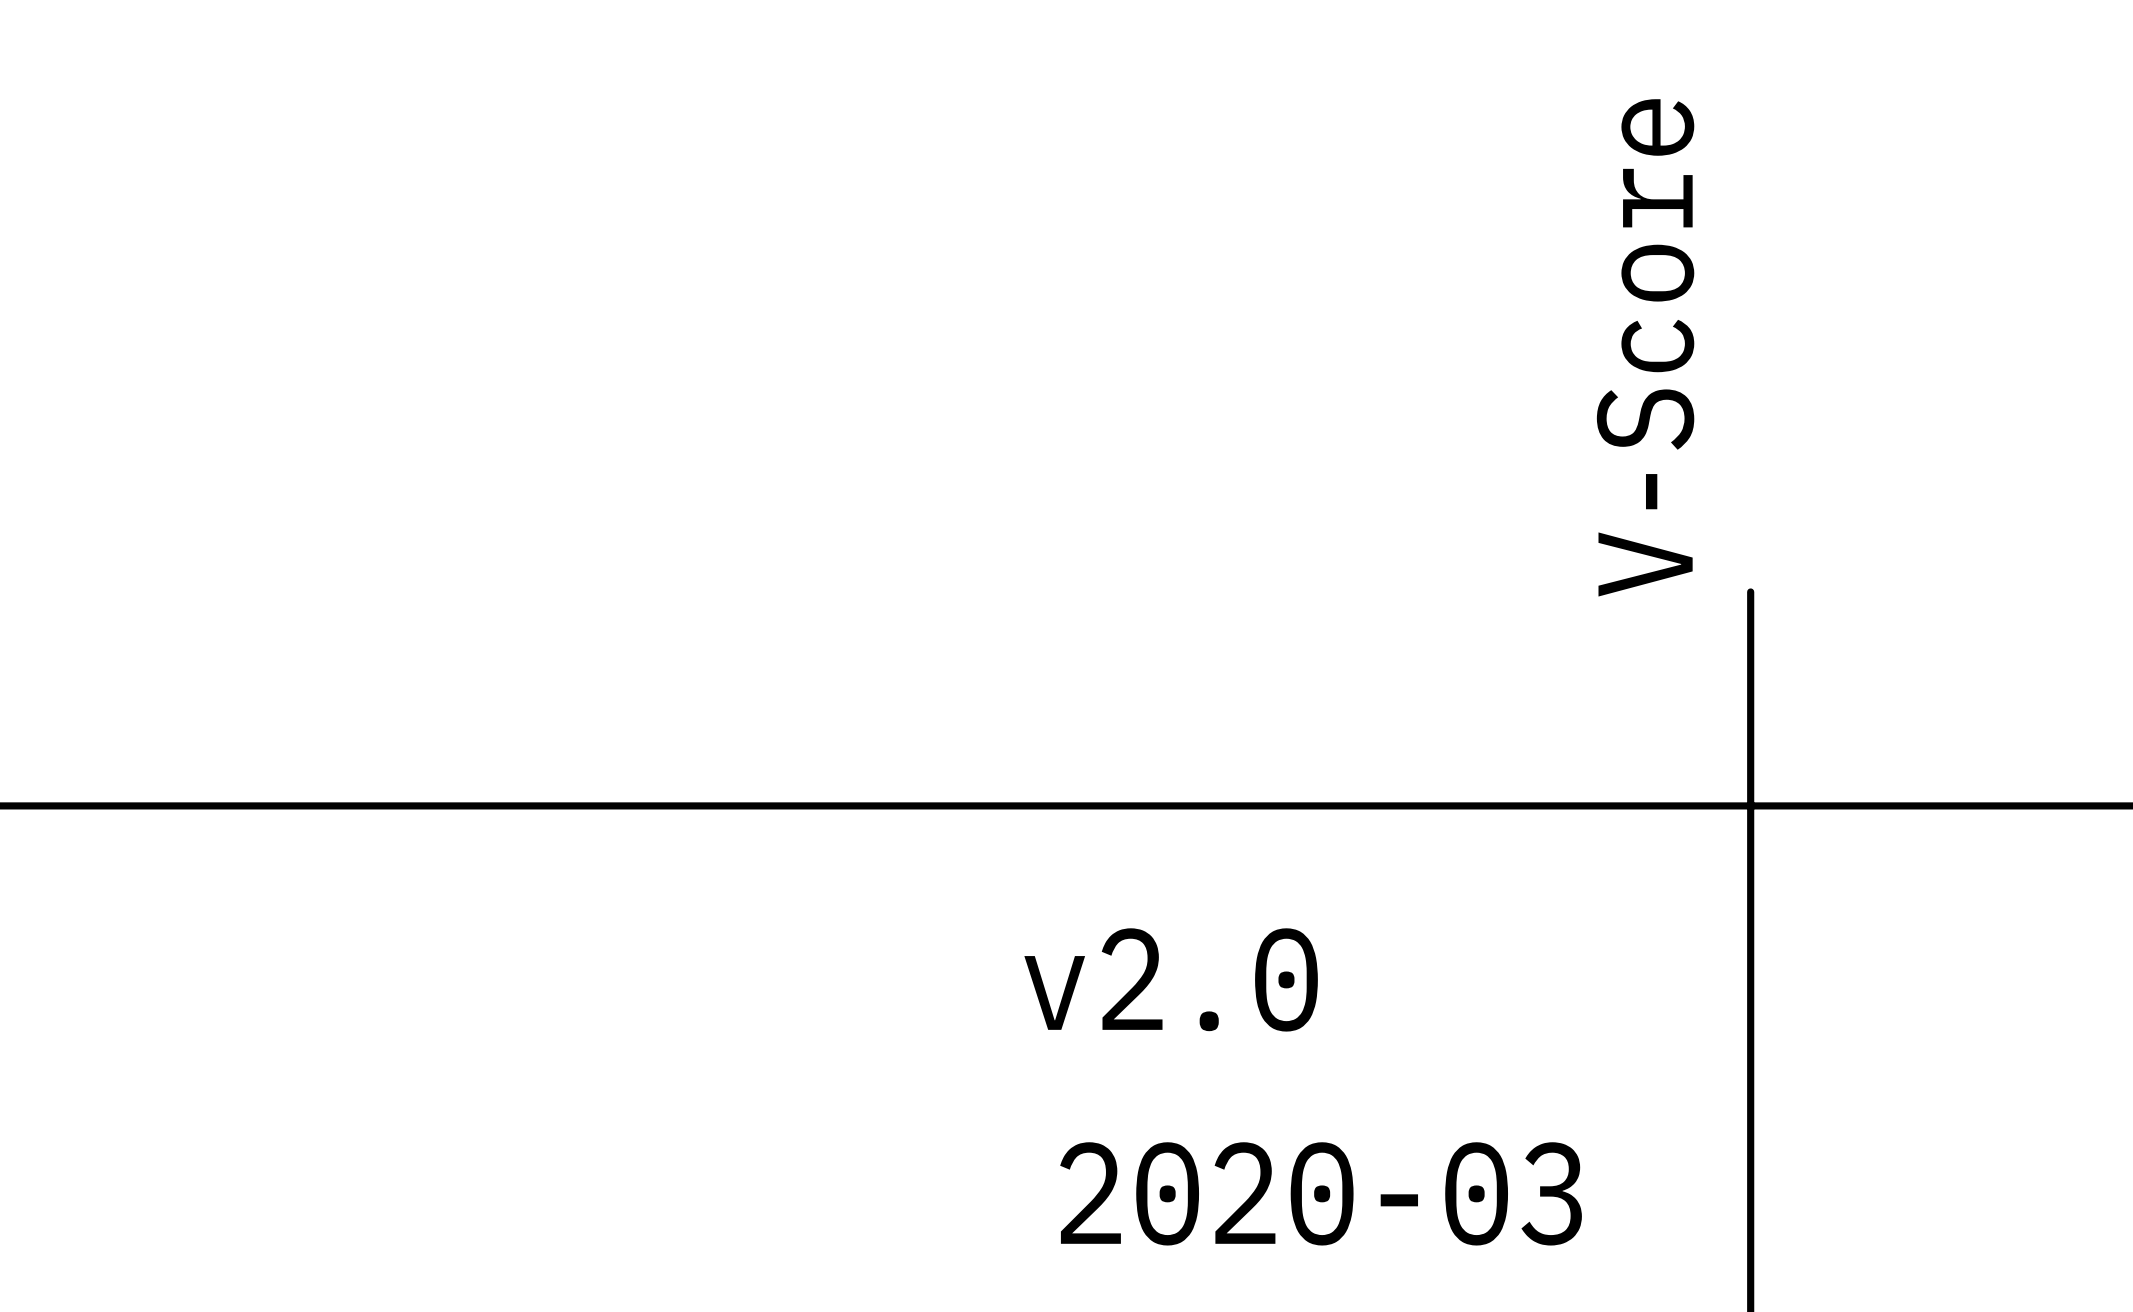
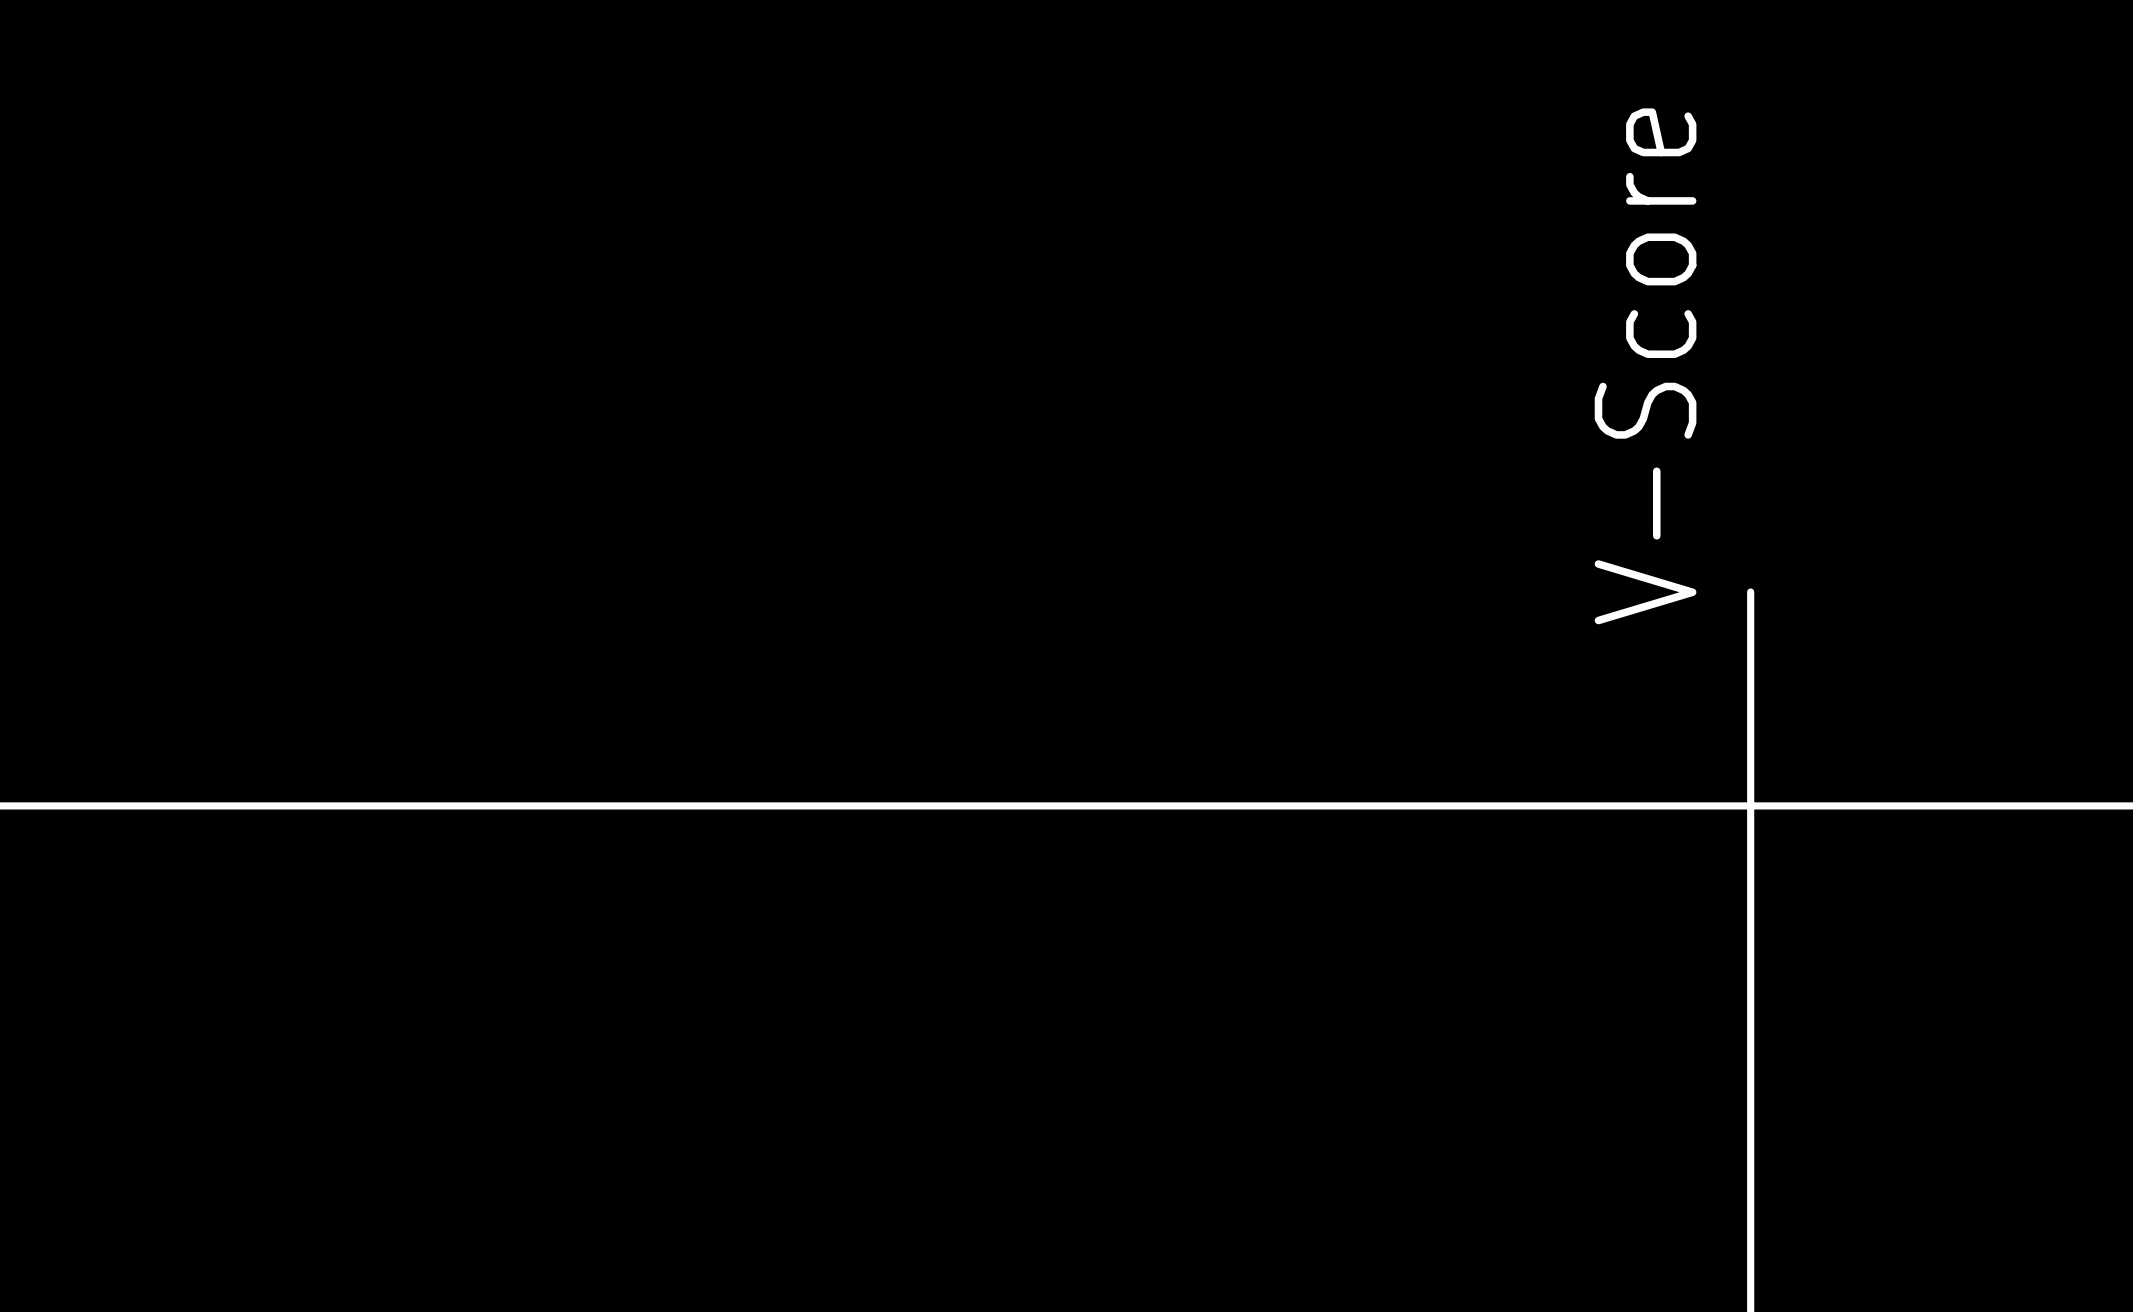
text: v2.0 (1171, 979) -> none
text: 2020-03 (1321, 1193) -> none

